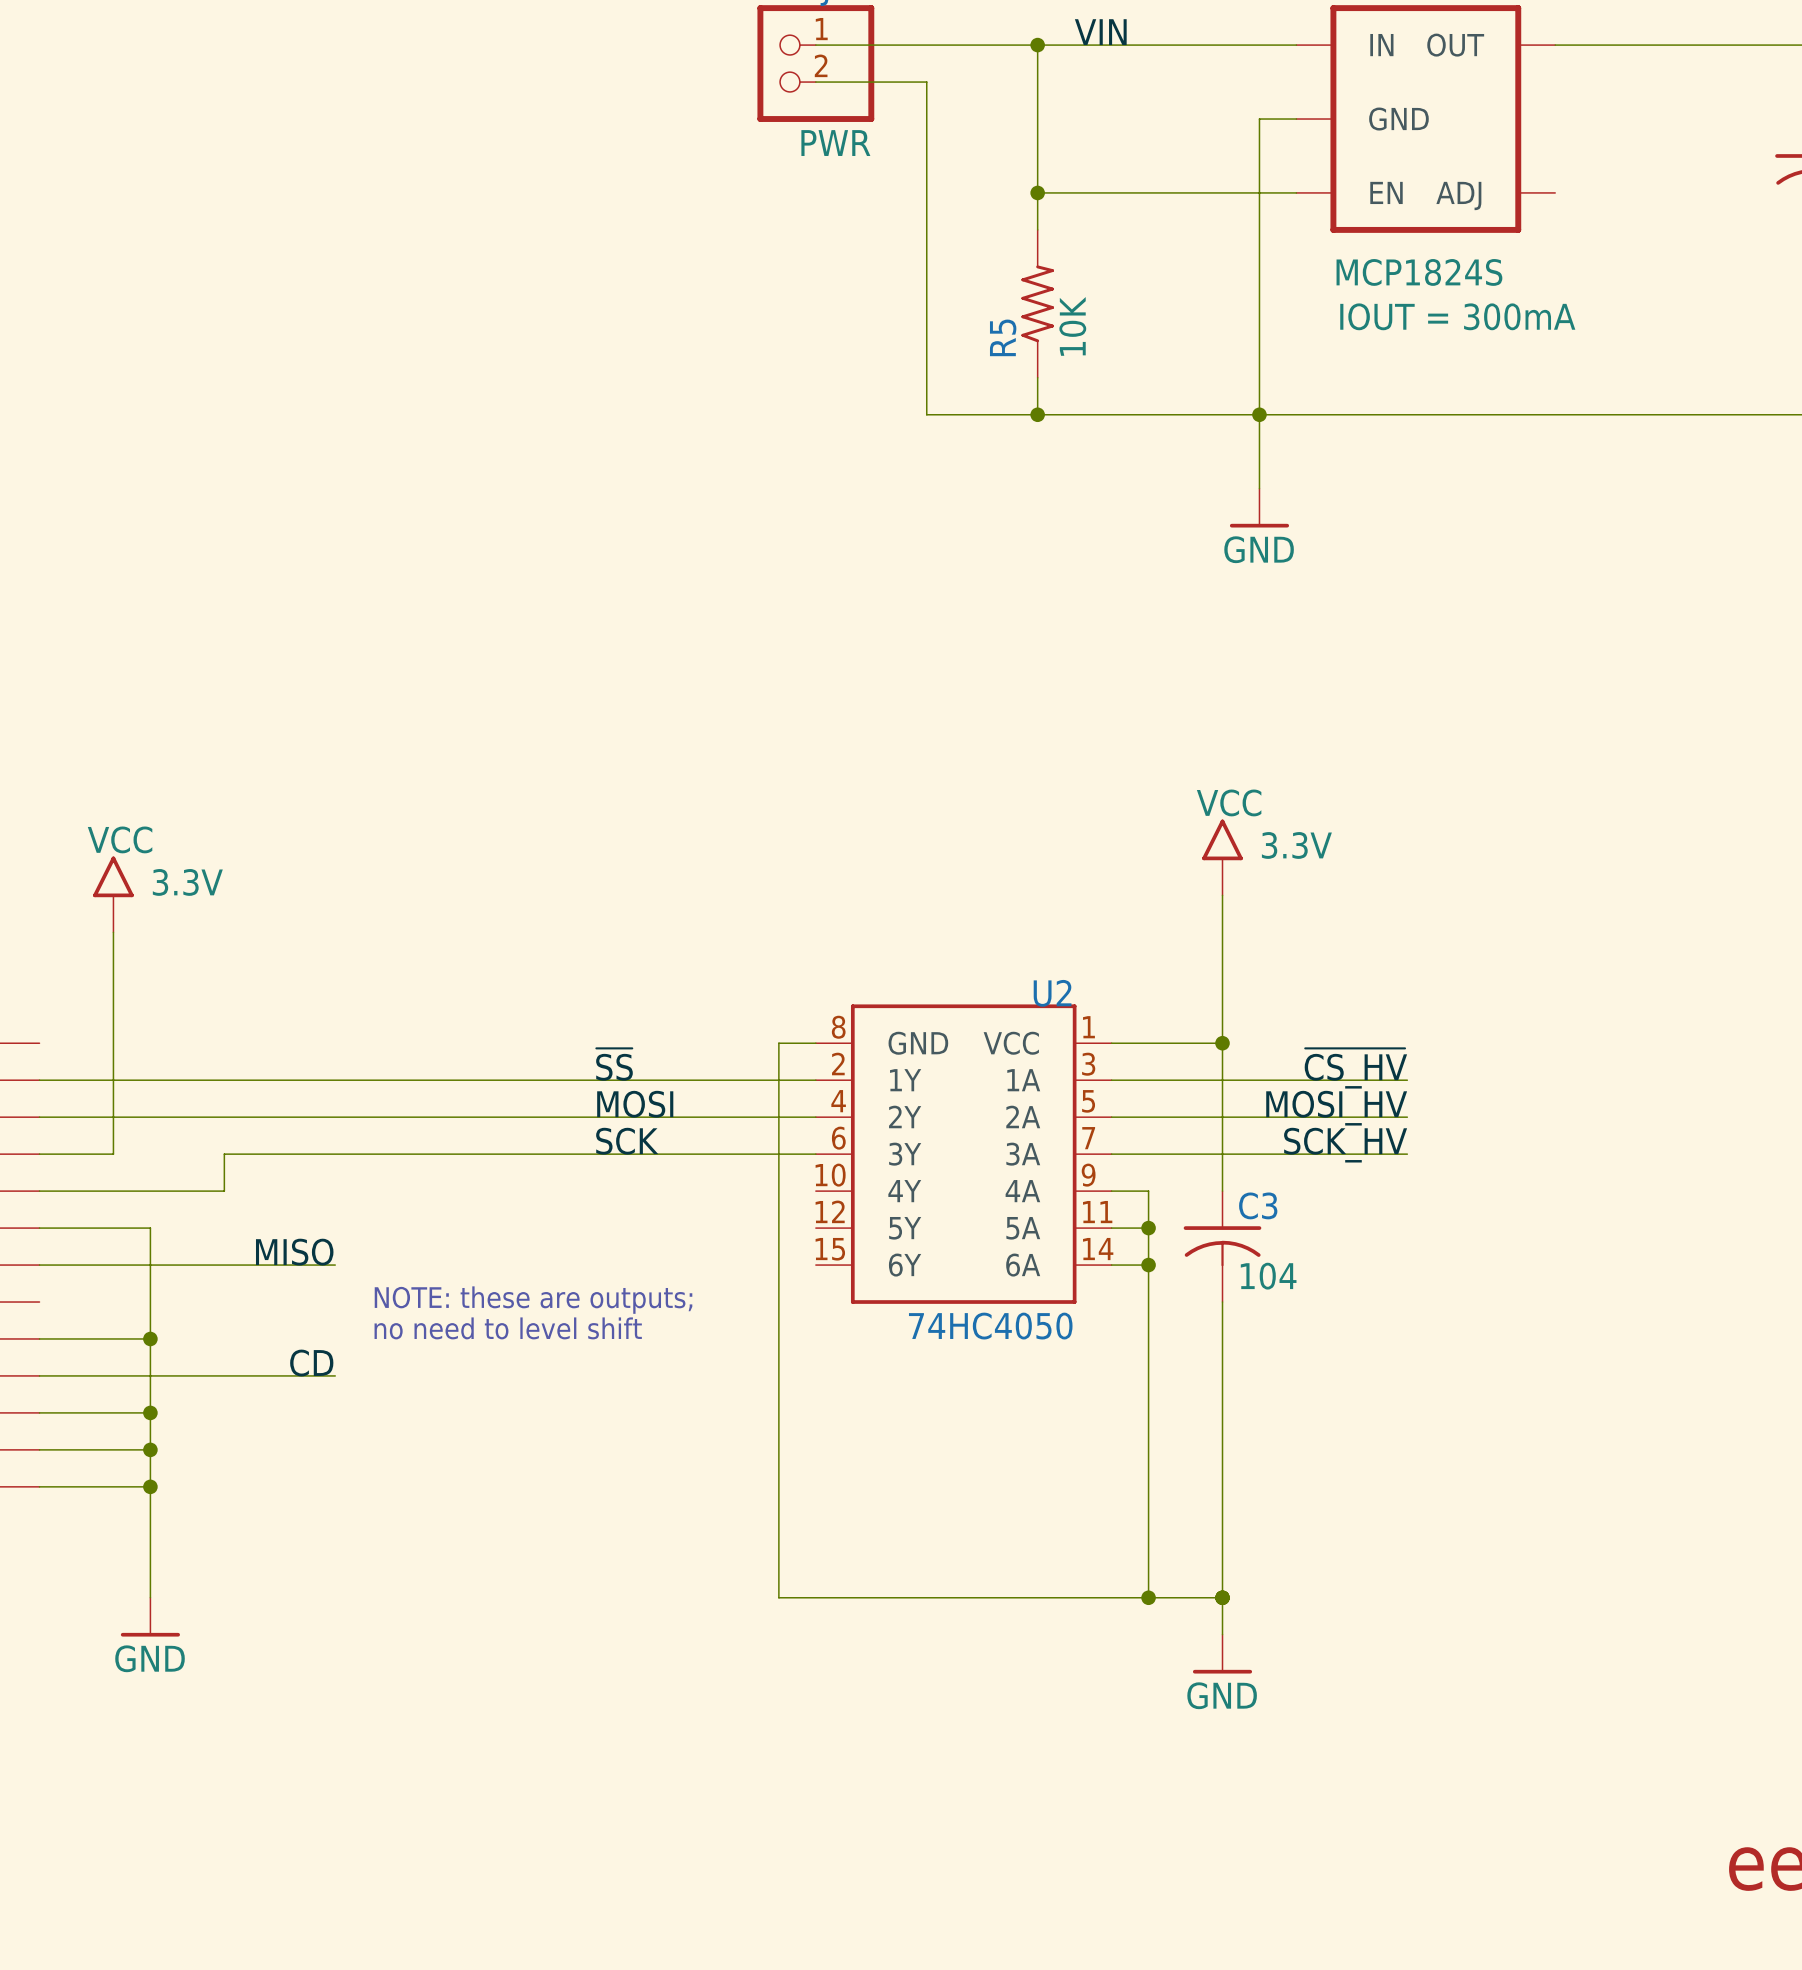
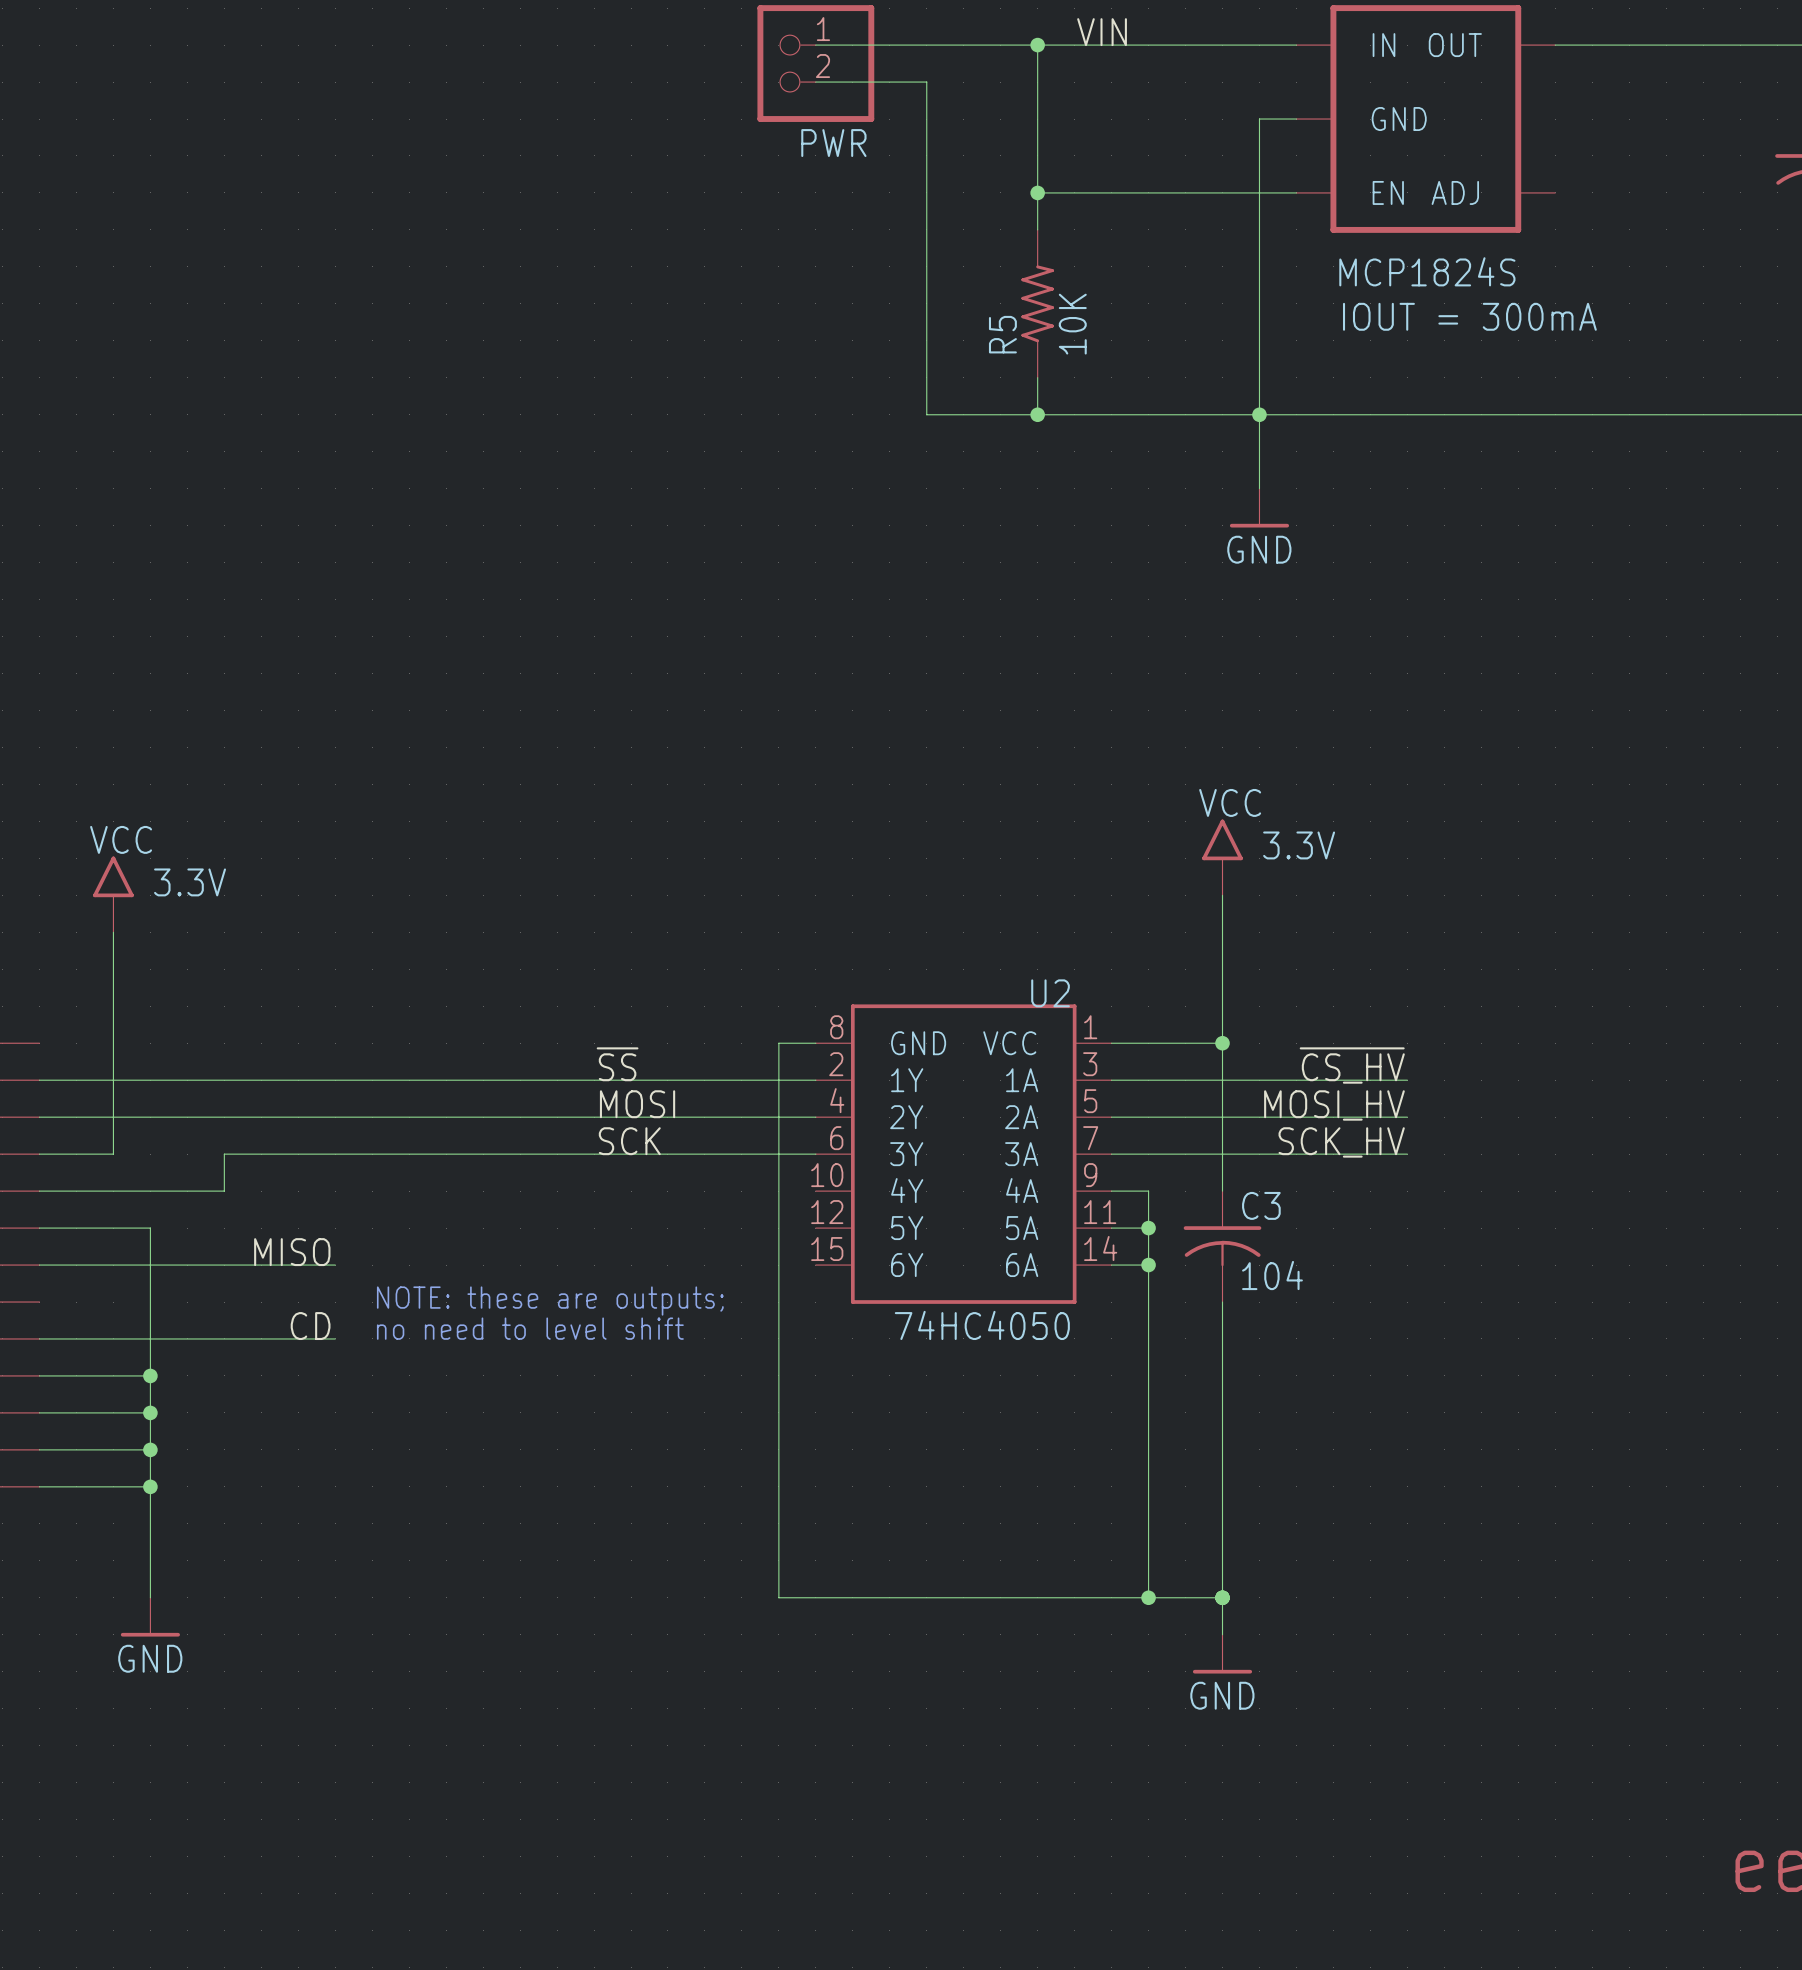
junction position: (150, 1338) -> (150, 1375)
label position: CD (311, 1363) -> CD (310, 1326)
wire: (150, 1375) (335, 1375) -> (150, 1338) (335, 1338)

